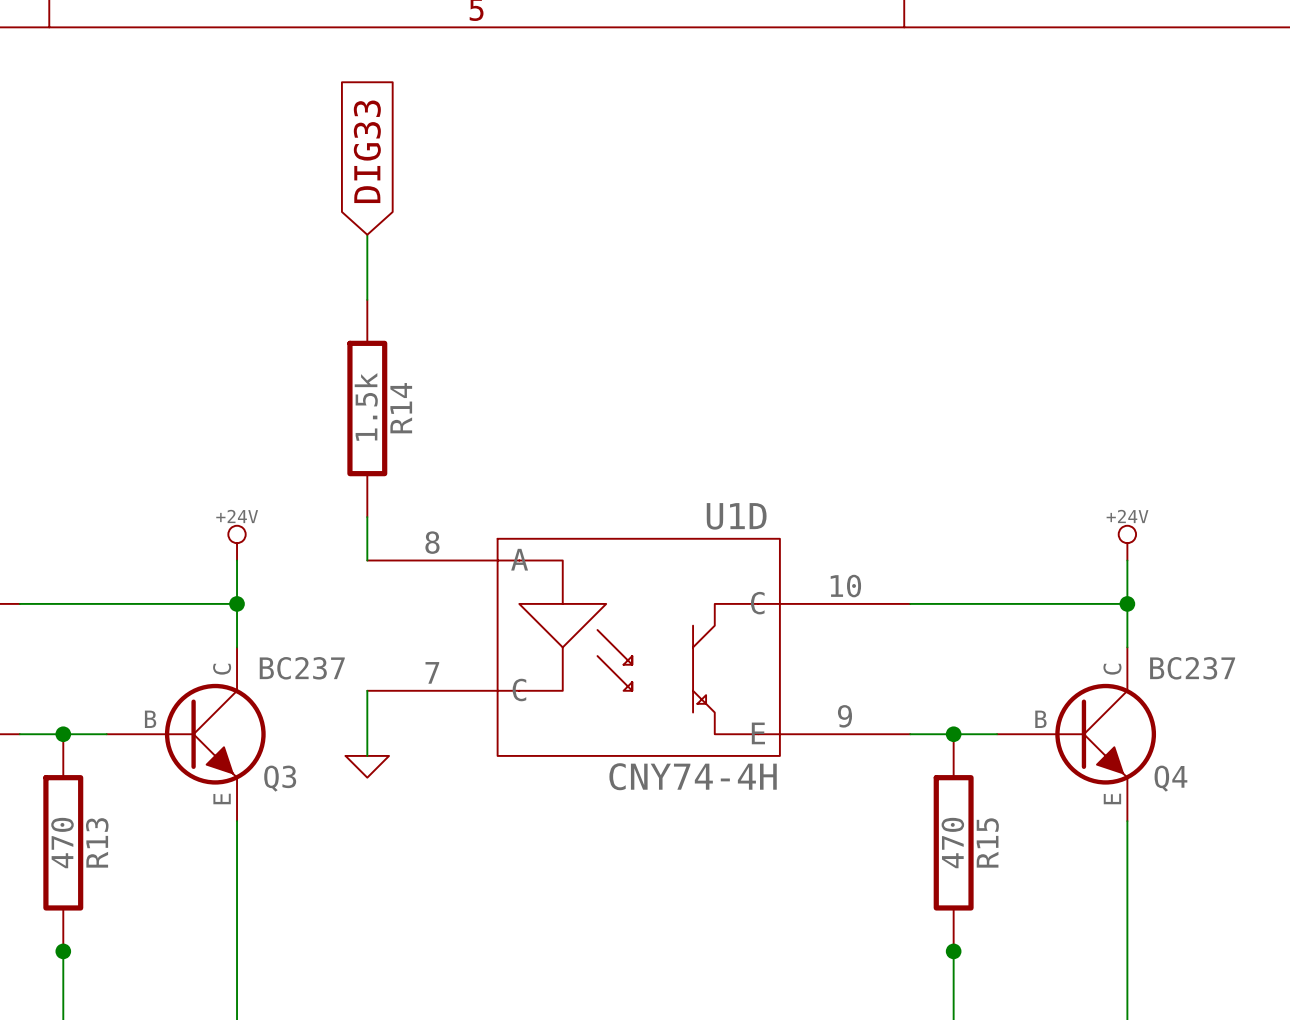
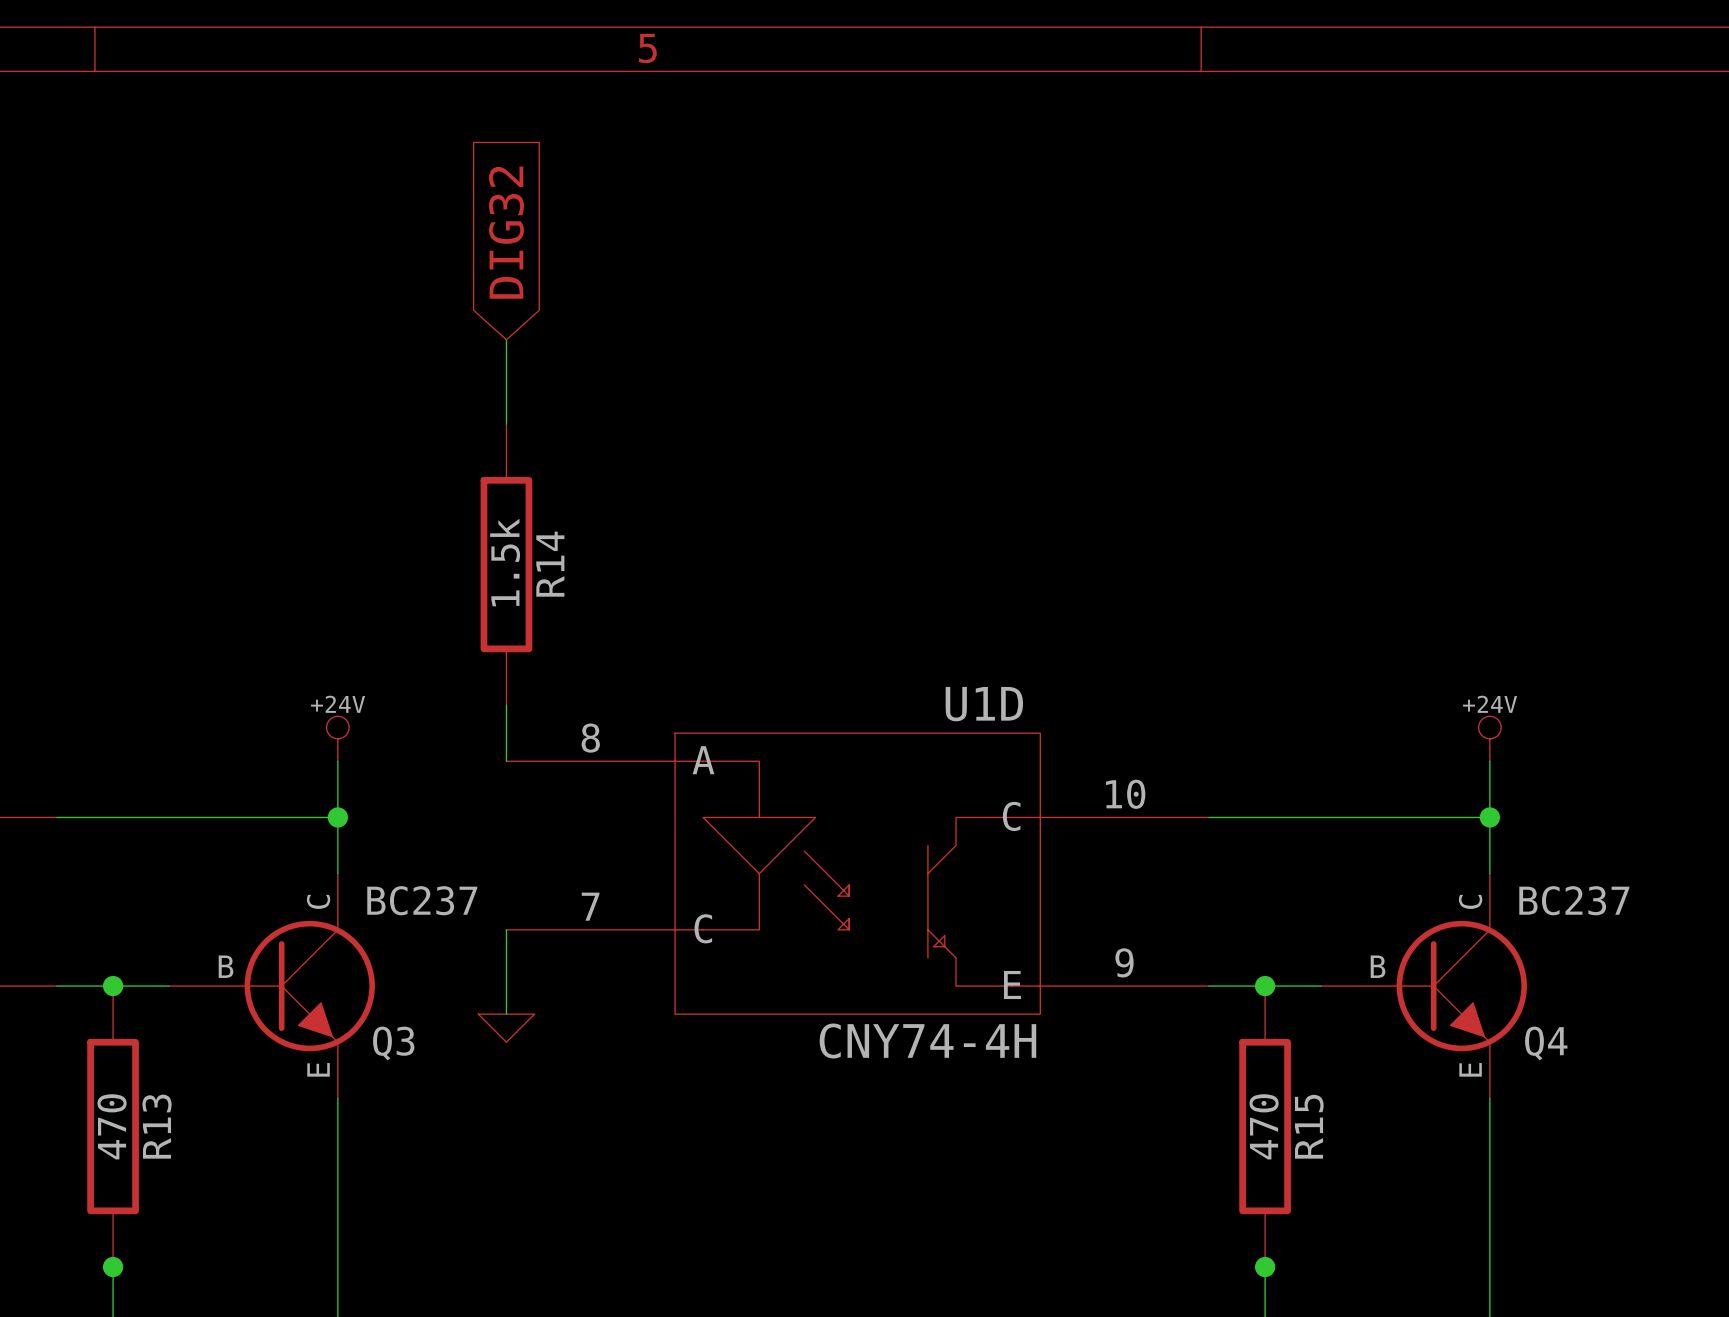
global label: DIG33 (367, 151) -> DIG32 (506, 232)

